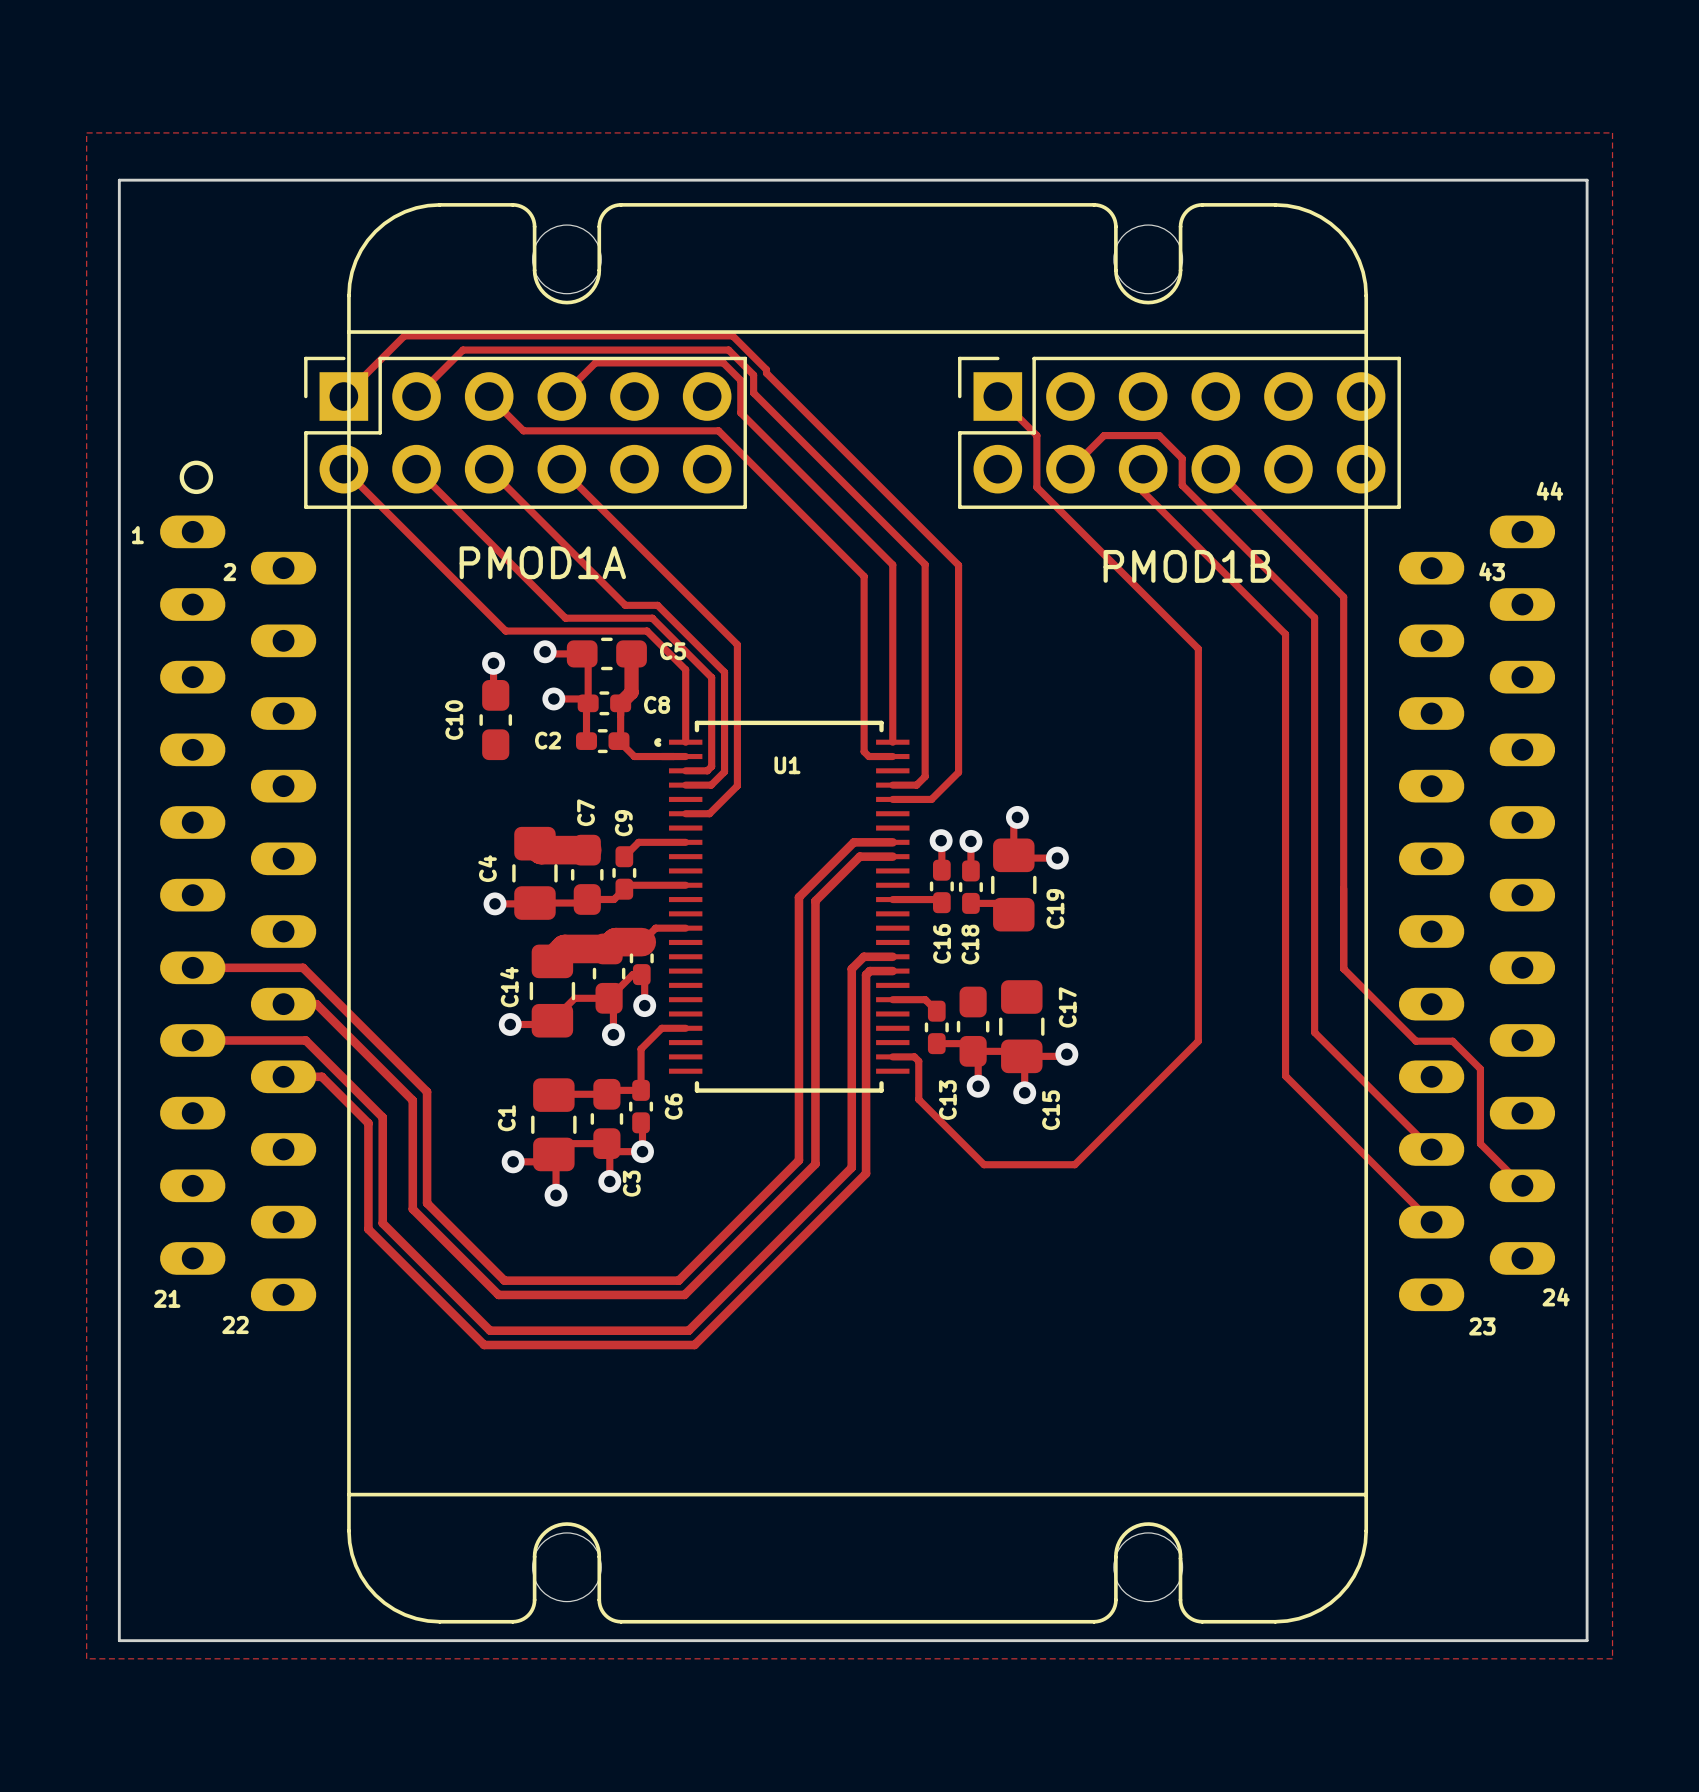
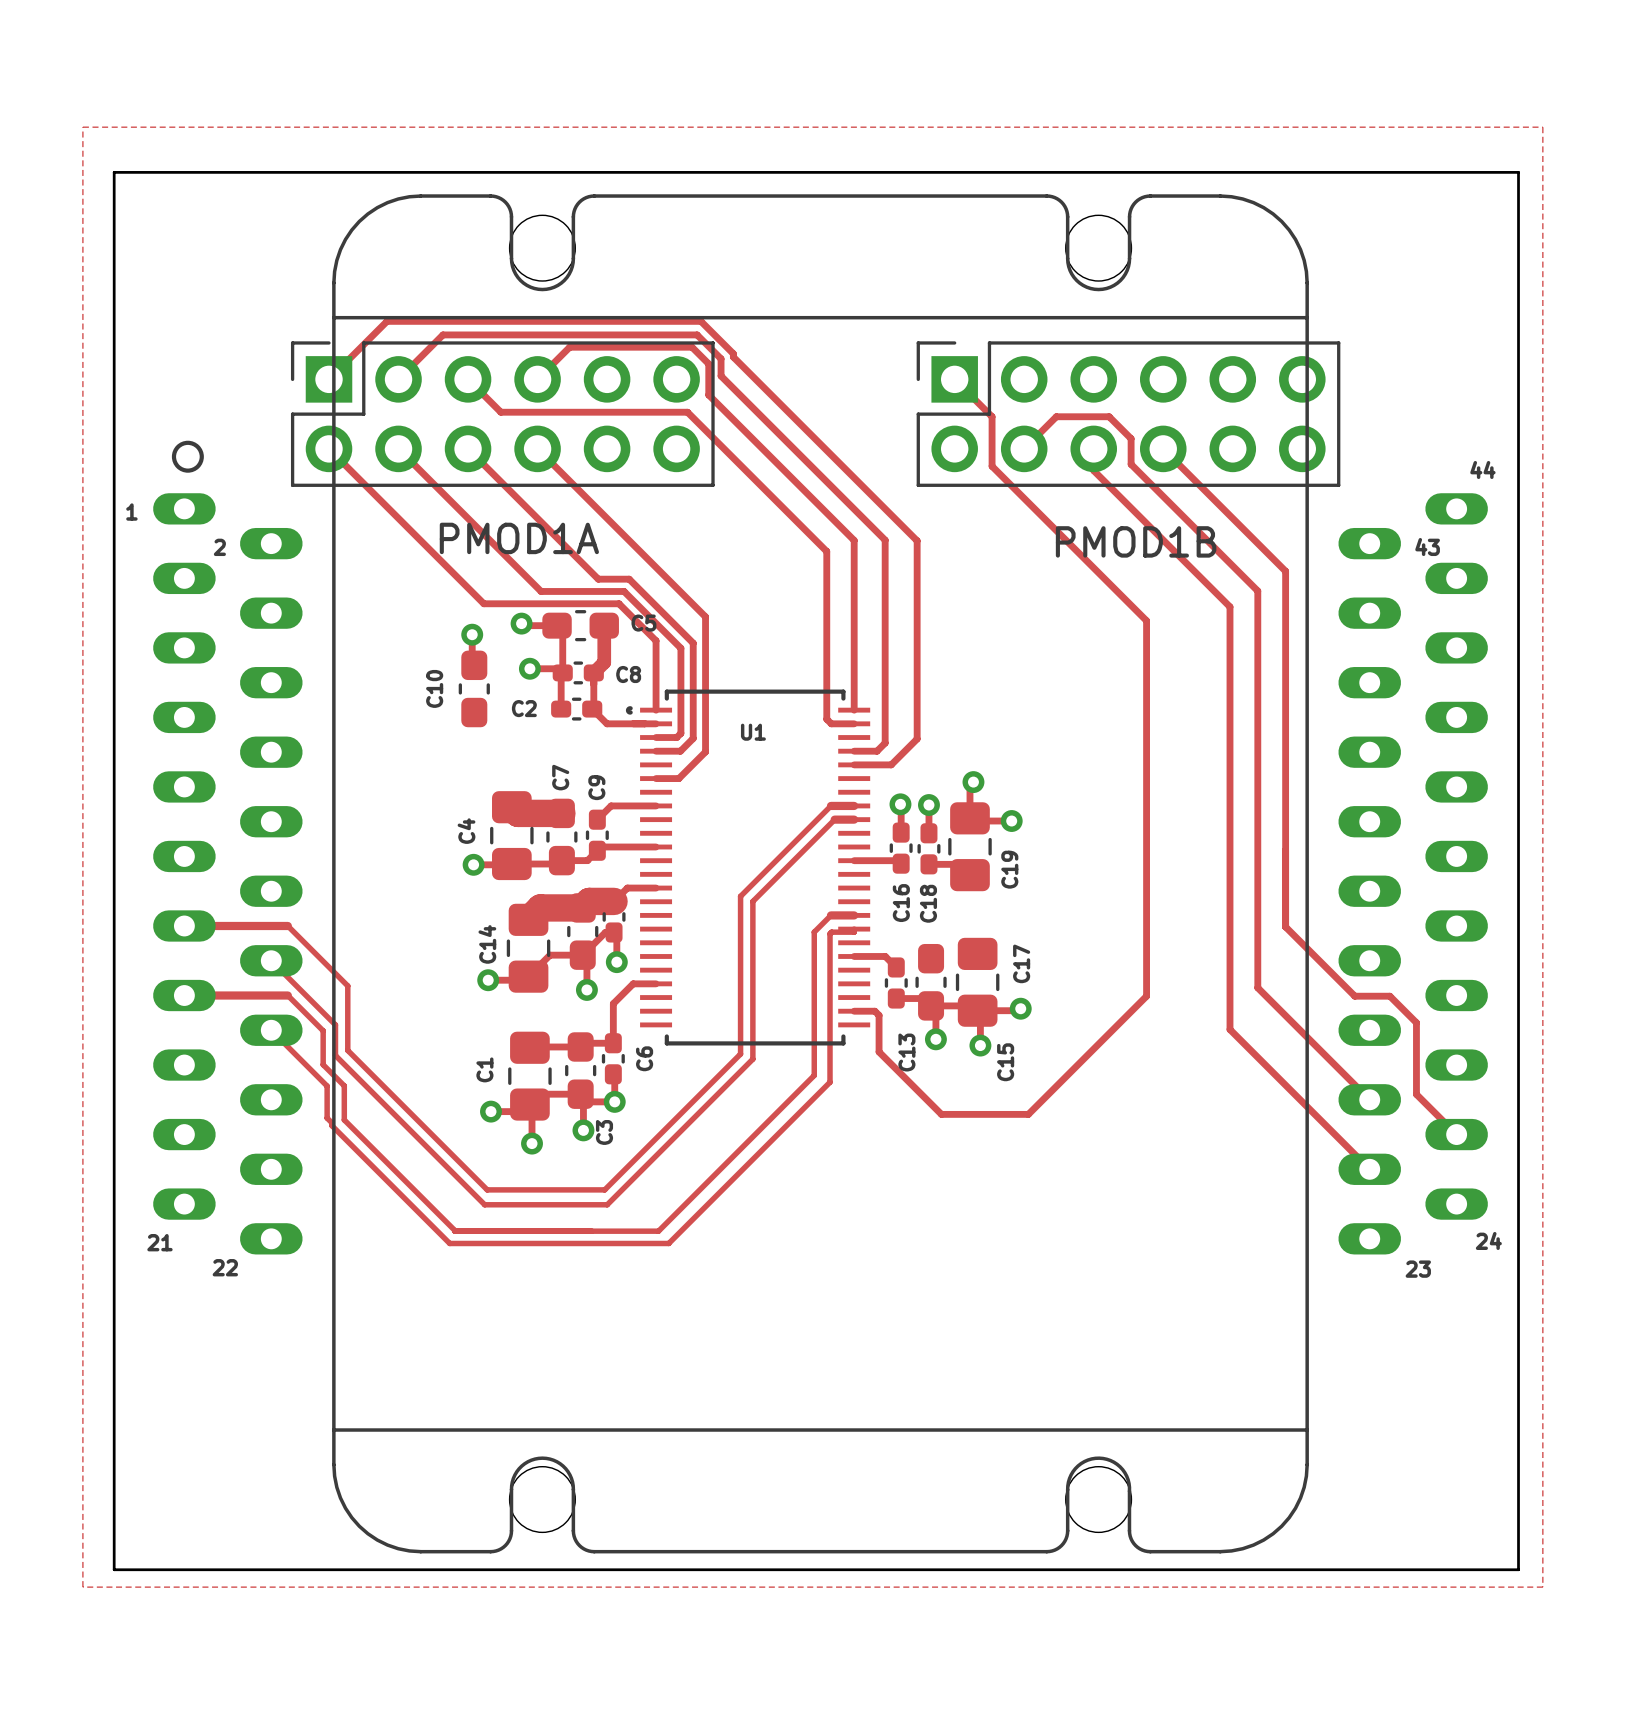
track: (868, 842) (853, 842) (798, 897) (798, 1160) (678, 1280) (504, 1280) (427, 1203) (427, 1091) (303, 967) (300, 967) -> (830, 805) (740, 896) (740, 1054) (604, 1189) (487, 1189) (347, 1050) (347, 985) (287, 925)
track: (872, 856) (859, 856) (815, 901) (815, 1164) (684, 1294) (498, 1294) (412, 1209) (412, 1100) (316, 1004) (283, 1004) -> (834, 819) (752, 901) (752, 1059) (607, 1204) (484, 1204) (335, 1055) (335, 1024) (271, 960)
track: (868, 956) (863, 956) (851, 968) (851, 1167) (688, 1330) (490, 1330) (382, 1223) (382, 1117) (305, 1040) (300, 1040) -> (830, 915) (814, 932) (814, 1075) (658, 1231) (454, 1231) (344, 1119) (344, 1085) (323, 1064) (323, 1030) (287, 995)
track: (892, 971) (869, 971) (866, 974) (866, 1173) (694, 1345) (484, 1345) (368, 1229) (368, 1123) (321, 1076) (283, 1076) -> (854, 929) (854, 932) (831, 932) (830, 933) (830, 1082) (668, 1243) (449, 1243) (332, 1125) (327, 1118) (327, 1086) (271, 1030)

